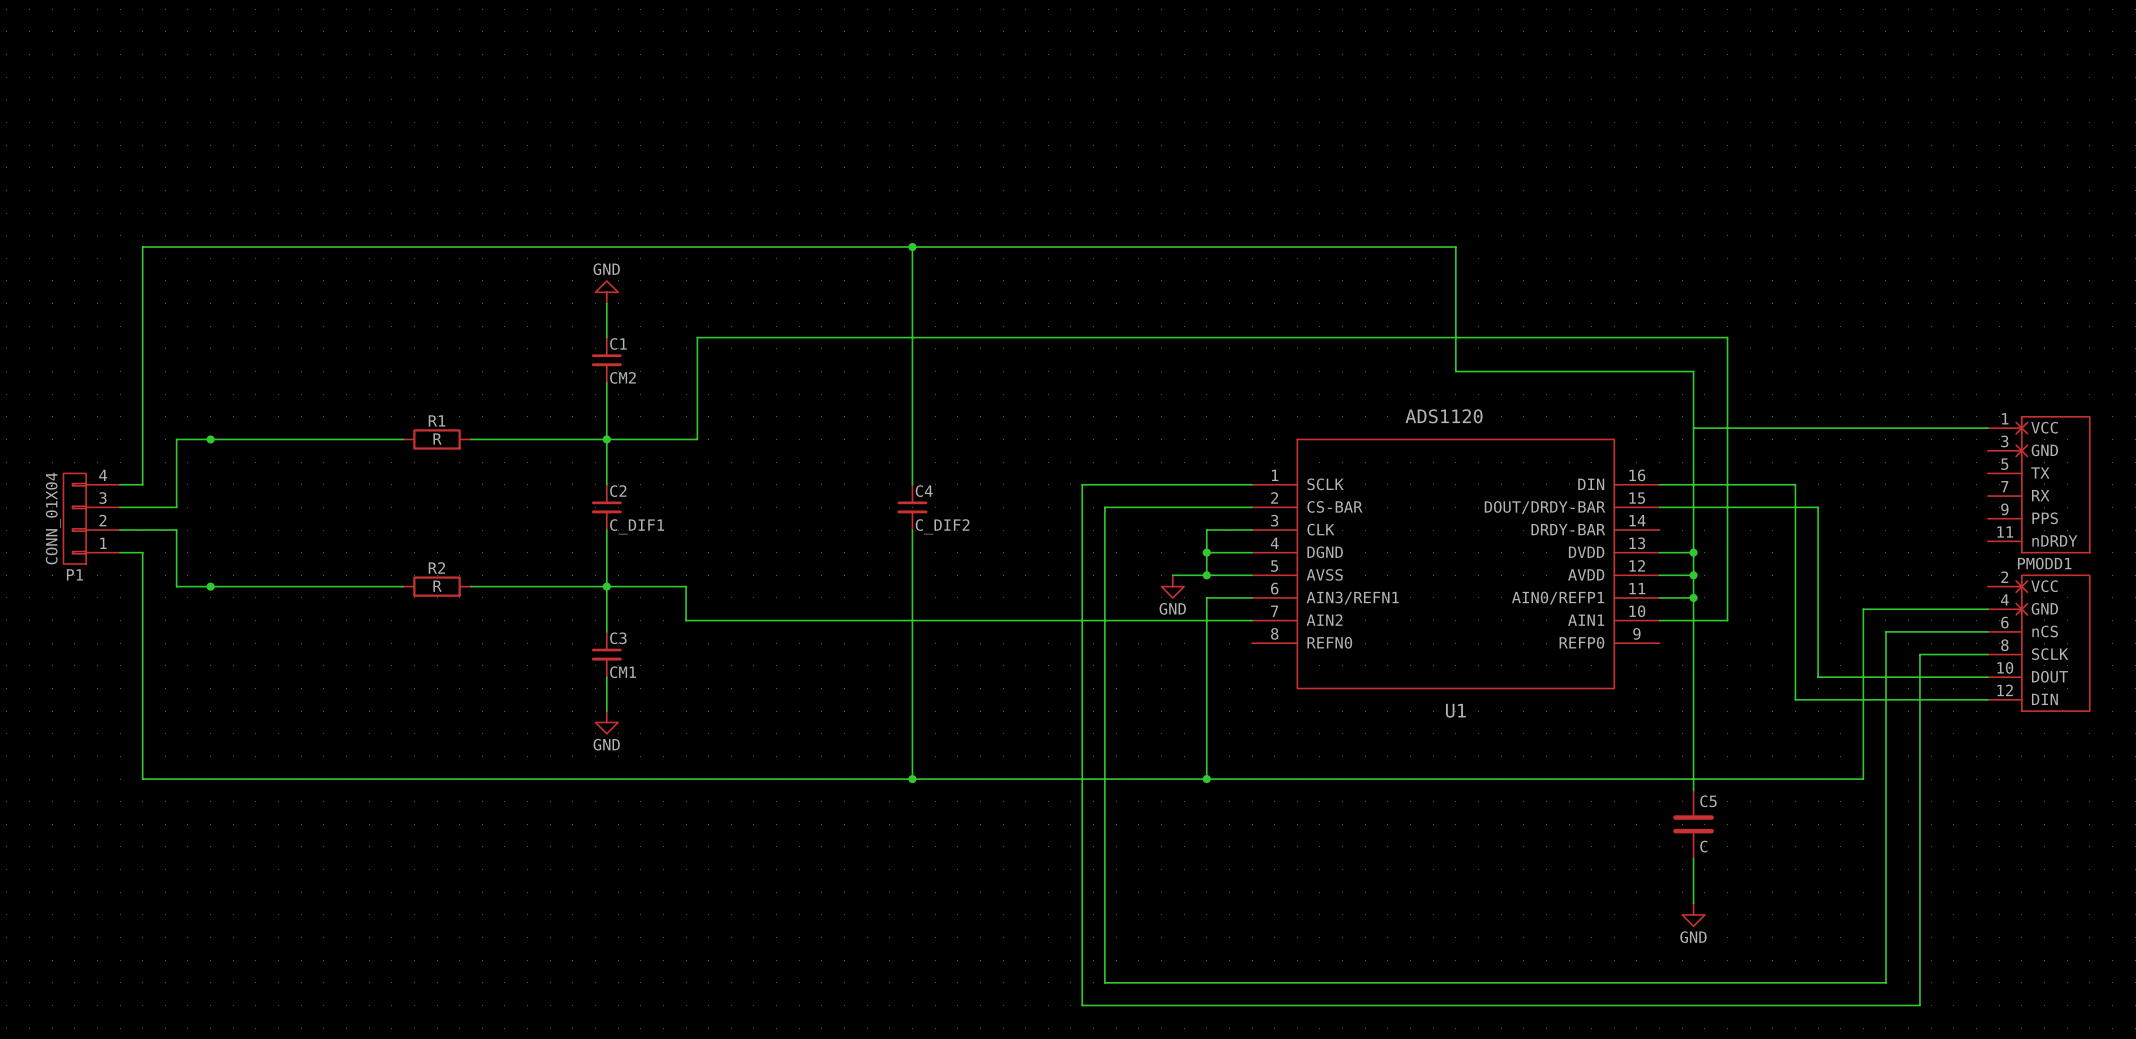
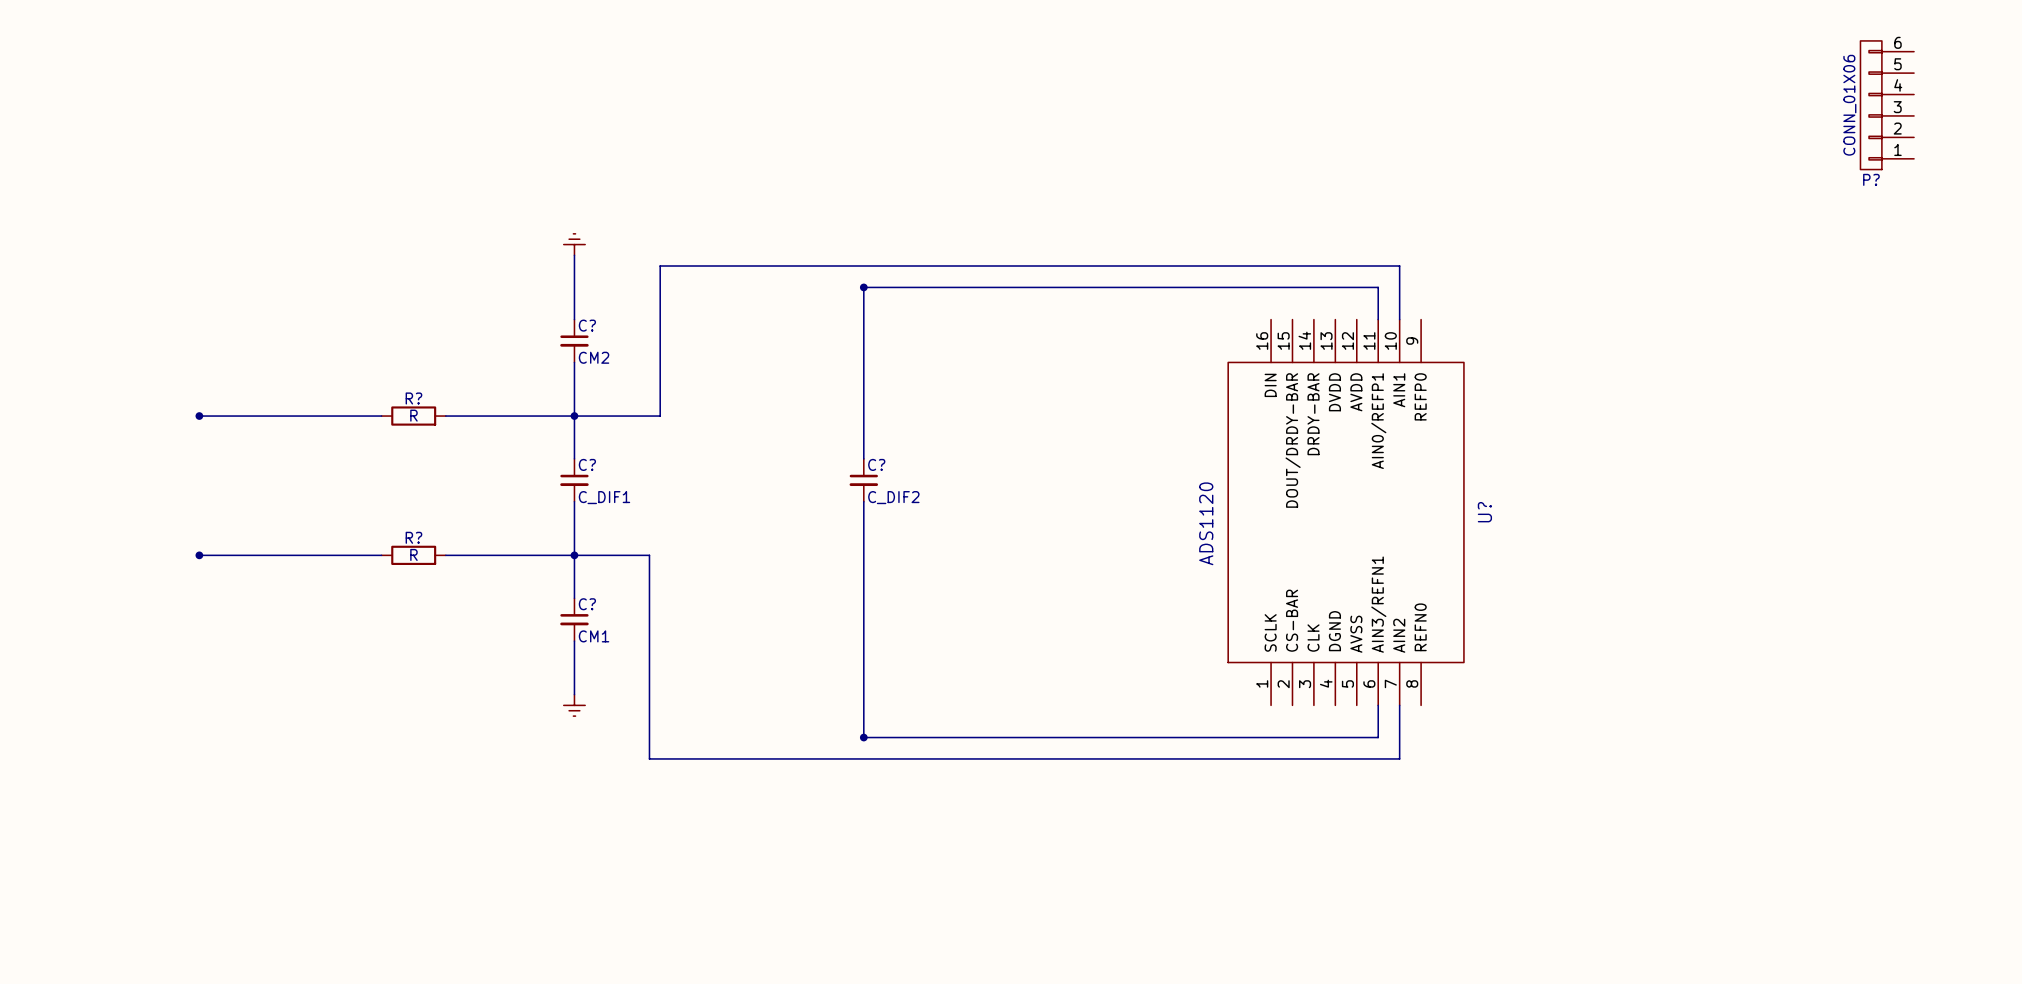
P?: none -> CONN_01X06 (1887, 105)
wire: (912, 247) (912, 303) -> (1378, 287) (863, 287)
junction: (912, 247) -> none
power symbol: none -> (574, 244)
power symbol: GND (606, 292) -> none
junction: none -> (863, 287)
wire: (1455, 303) (1455, 247) (142, 247) (142, 484) (120, 484) -> none
wire: (697, 337) (1727, 337) (1727, 620) (1659, 620) -> (660, 319) (660, 266) (1399, 266) (1399, 319)
wire: (1455, 337) (1455, 371) (1693, 371) (1693, 790) -> none
C1 name: C1 (618, 343) -> C? (587, 325)
R1 name: R1 (437, 420) -> R? (413, 398)
wire: (1693, 428) (1987, 428) -> none
wire: (210, 439) (176, 439) (176, 507) (120, 507) -> none
wire: (1252, 484) (1082, 484) (1082, 1005) (1919, 1005) (1919, 654) (1987, 654) -> none
wire: (1659, 484) (1795, 484) (1795, 699) (1987, 699) -> none
C2 name: C2 (618, 491) -> C? (587, 464)
C4 name: C4 (924, 491) -> C? (876, 464)
wire: (1252, 507) (1104, 507) (1104, 982) (1885, 982) (1885, 631) (1987, 631) -> none
wire: (1659, 507) (1818, 507) (1818, 677) (1987, 677) -> none
P1: CONN_01X04 (91, 518) -> none
wire: (120, 530) (176, 530) (176, 586) (210, 586) -> none
wire: (1252, 530) (1206, 530) (1206, 575) -> none
U?: none -> ADS1120 (1346, 512)
wire: (120, 552) (142, 552) (142, 779) (912, 779) -> none
wire: (1206, 552) (1252, 552) -> none
junction: (1206, 552) -> none
wire: (1659, 552) (1693, 552) -> none
junction: (1693, 552) -> none
U1: ADS1120 (1455, 563) -> none
PMODD1: (2038, 563) -> none
R2 name: R2 (436, 567) -> R? (413, 537)
wire: (1172, 575) (1252, 575) -> none
junction: (1206, 575) -> none
wire: (1659, 575) (1693, 575) -> none
junction: (1693, 575) -> none
power symbol: GND (1172, 586) -> none
wire: (1252, 597) (1206, 597) (1206, 779) -> none
wire: (1659, 597) (1693, 597) -> none
junction: (1693, 597) -> none
wire: (1987, 609) (1863, 609) (1863, 779) (1455, 779) -> (1378, 705) (1378, 737)
wire: (686, 620) (1252, 620) -> (649, 587) (649, 758) (1399, 758) (1399, 705)
C3 name: C3 (618, 638) -> C? (587, 604)
power symbol: GND (606, 722) -> none
power symbol: none -> (574, 705)
junction: (1206, 779) -> none
C5: C (1693, 824) -> none
wire: (1693, 858) (1693, 903) -> none
power symbol: GND (1693, 914) -> none

